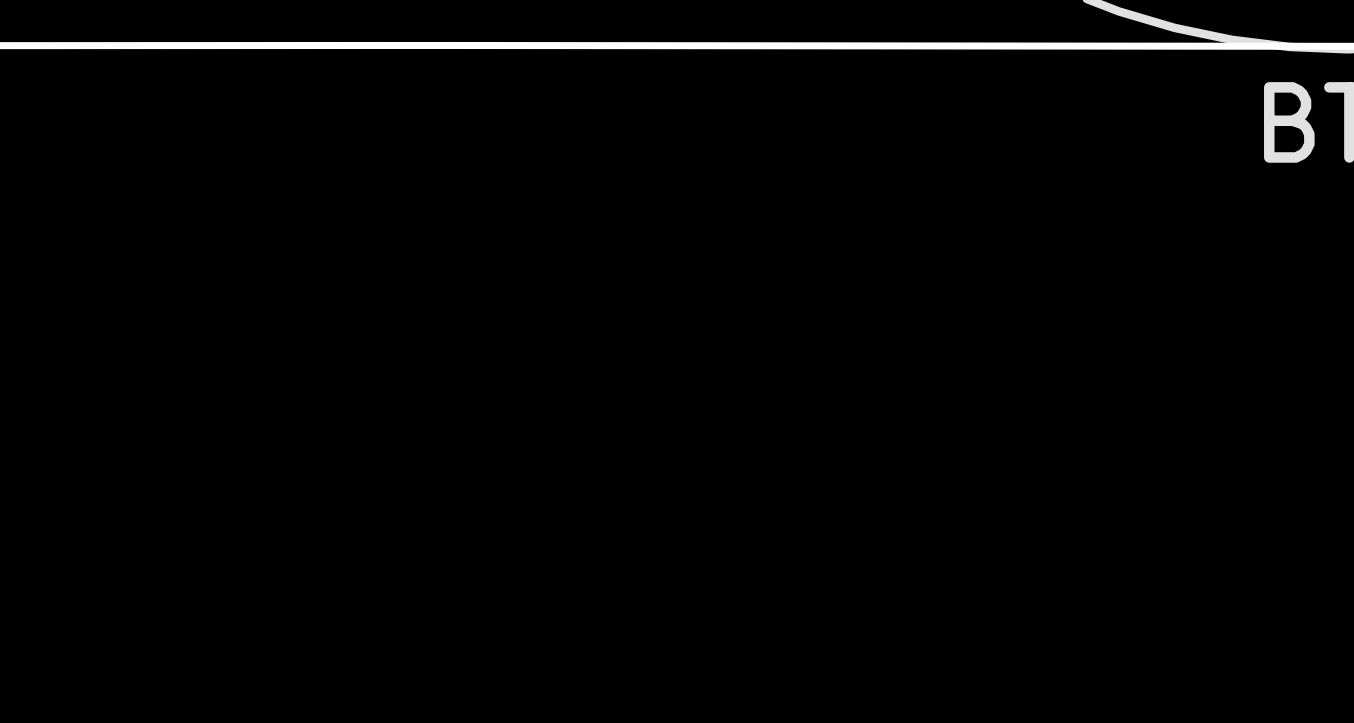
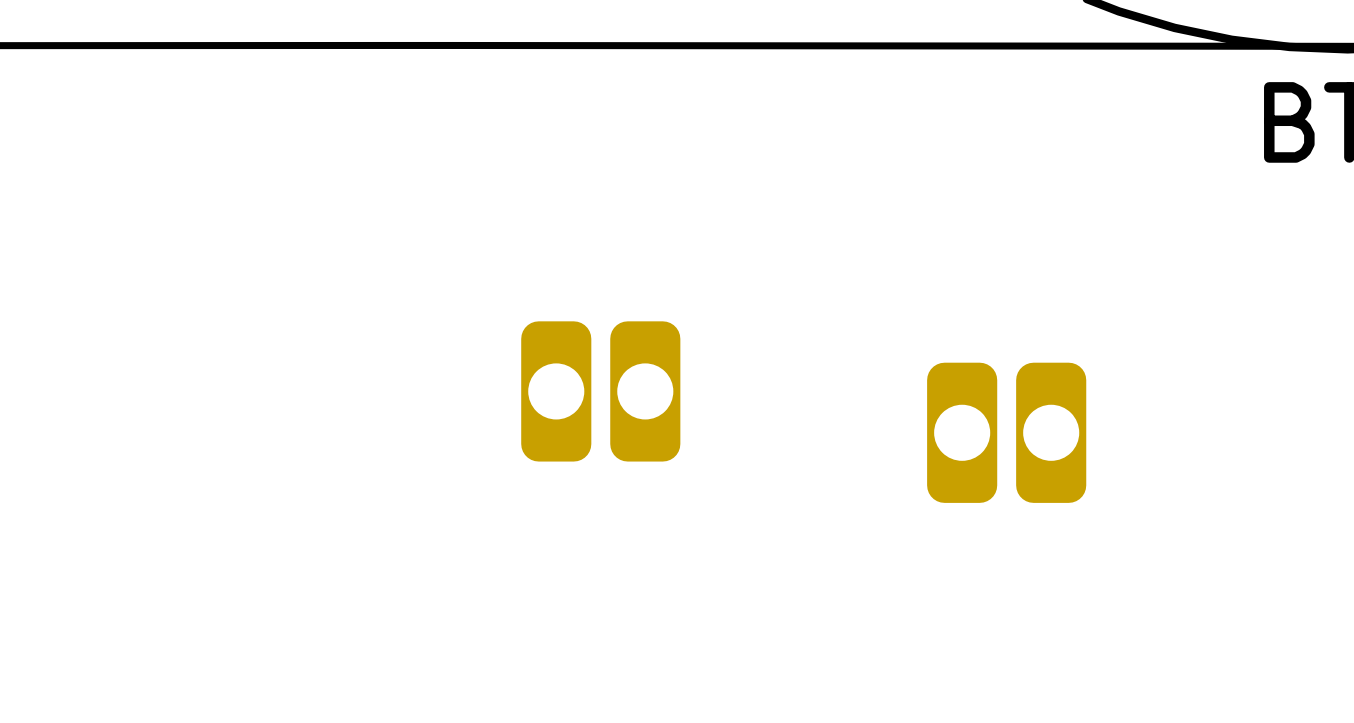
part: none -> (600, 391)
part: none -> (1006, 432)

